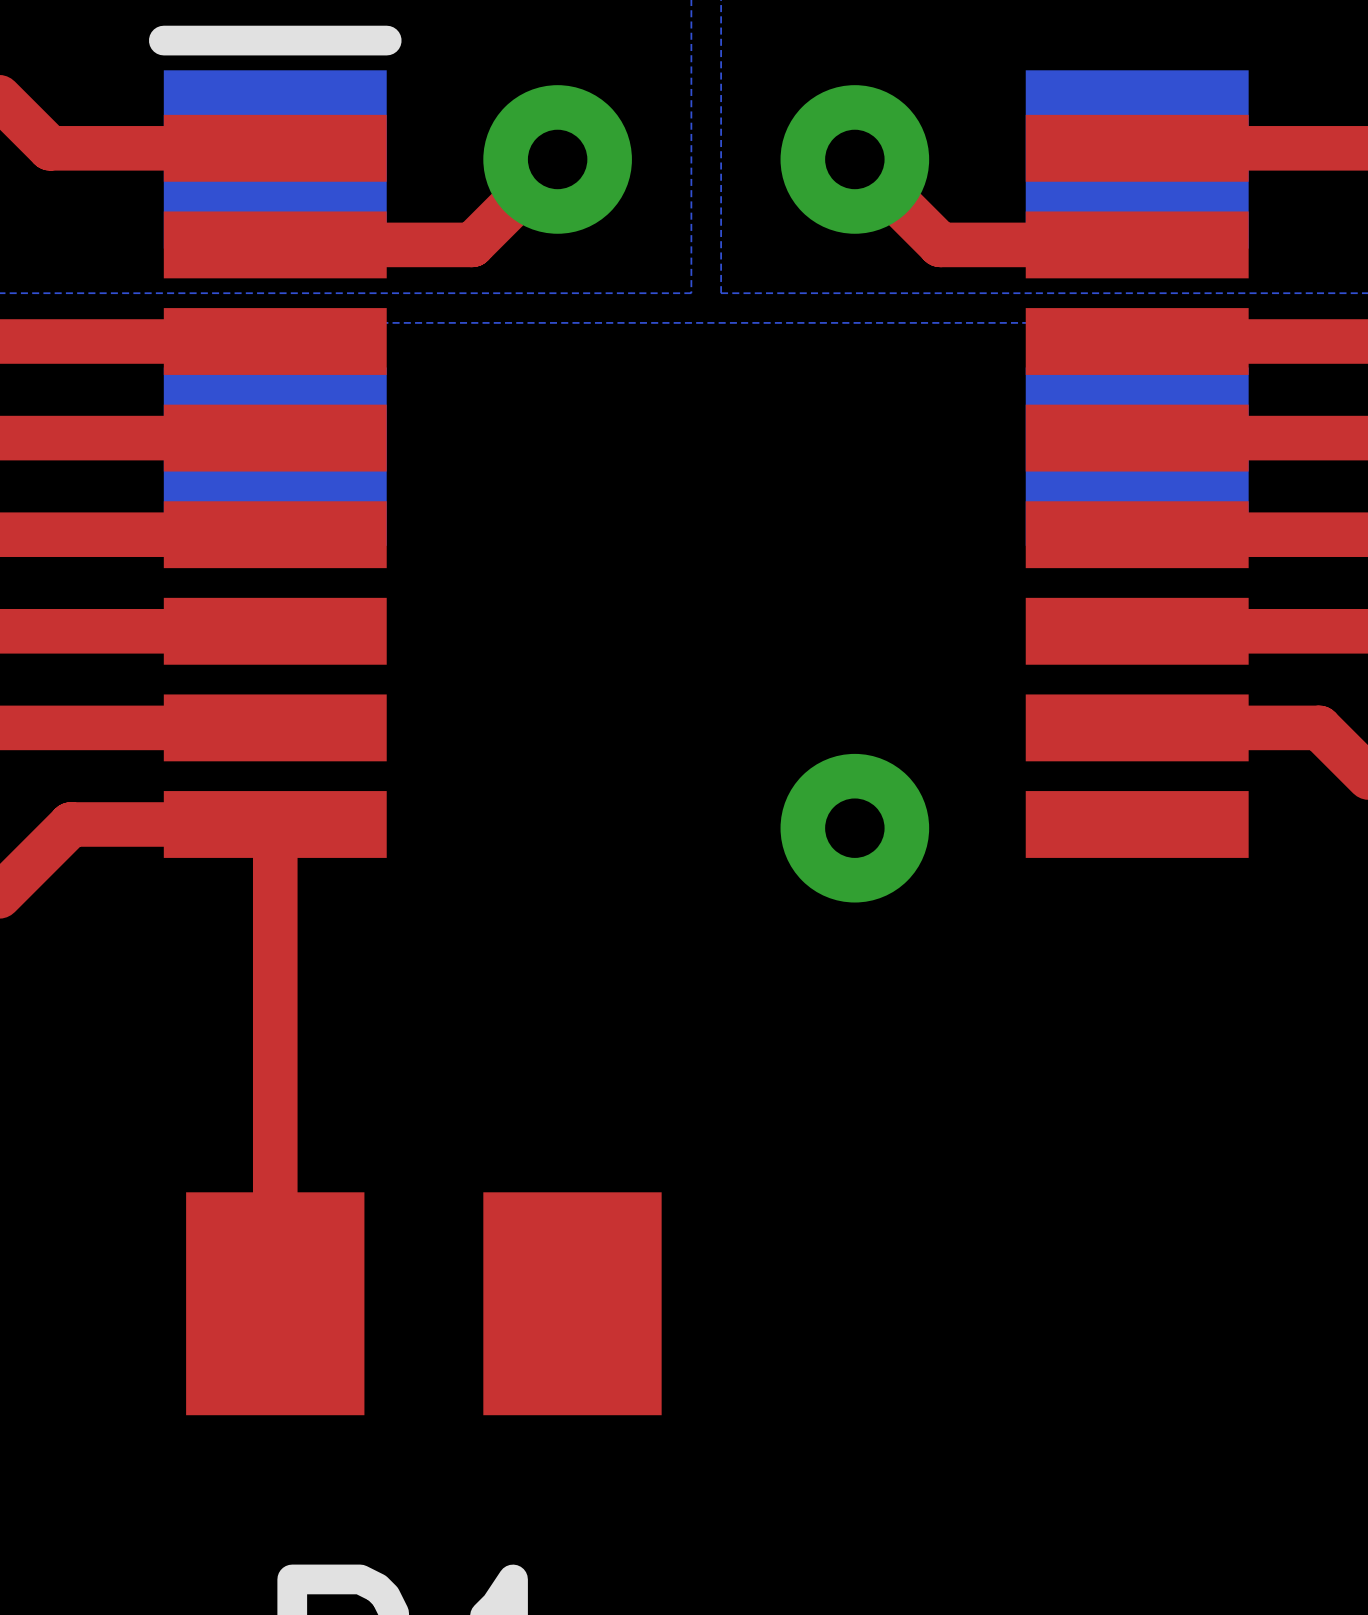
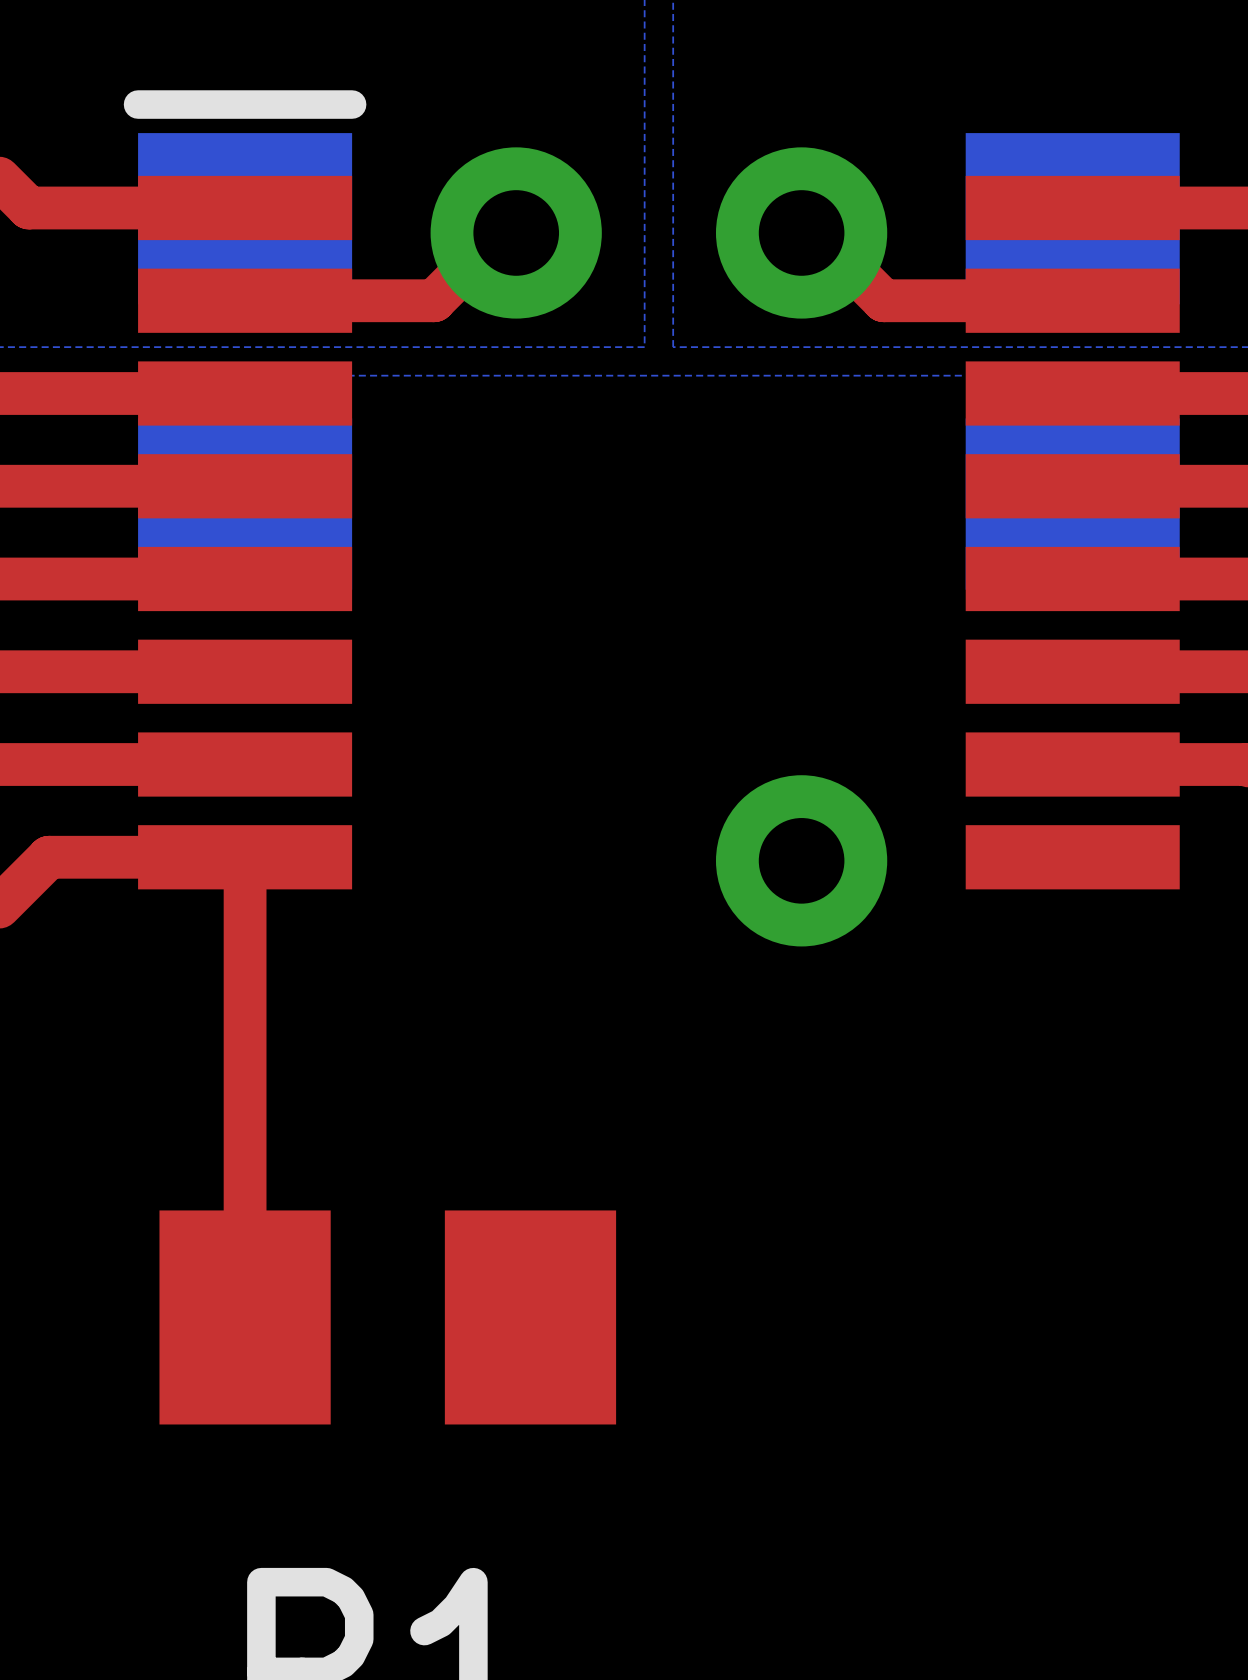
via size: [483, 85, 632, 234] -> [430, 147, 602, 319]
via size: [780, 85, 930, 234] -> [715, 147, 888, 319]
via size: [780, 753, 930, 903] -> [715, 775, 888, 947]

